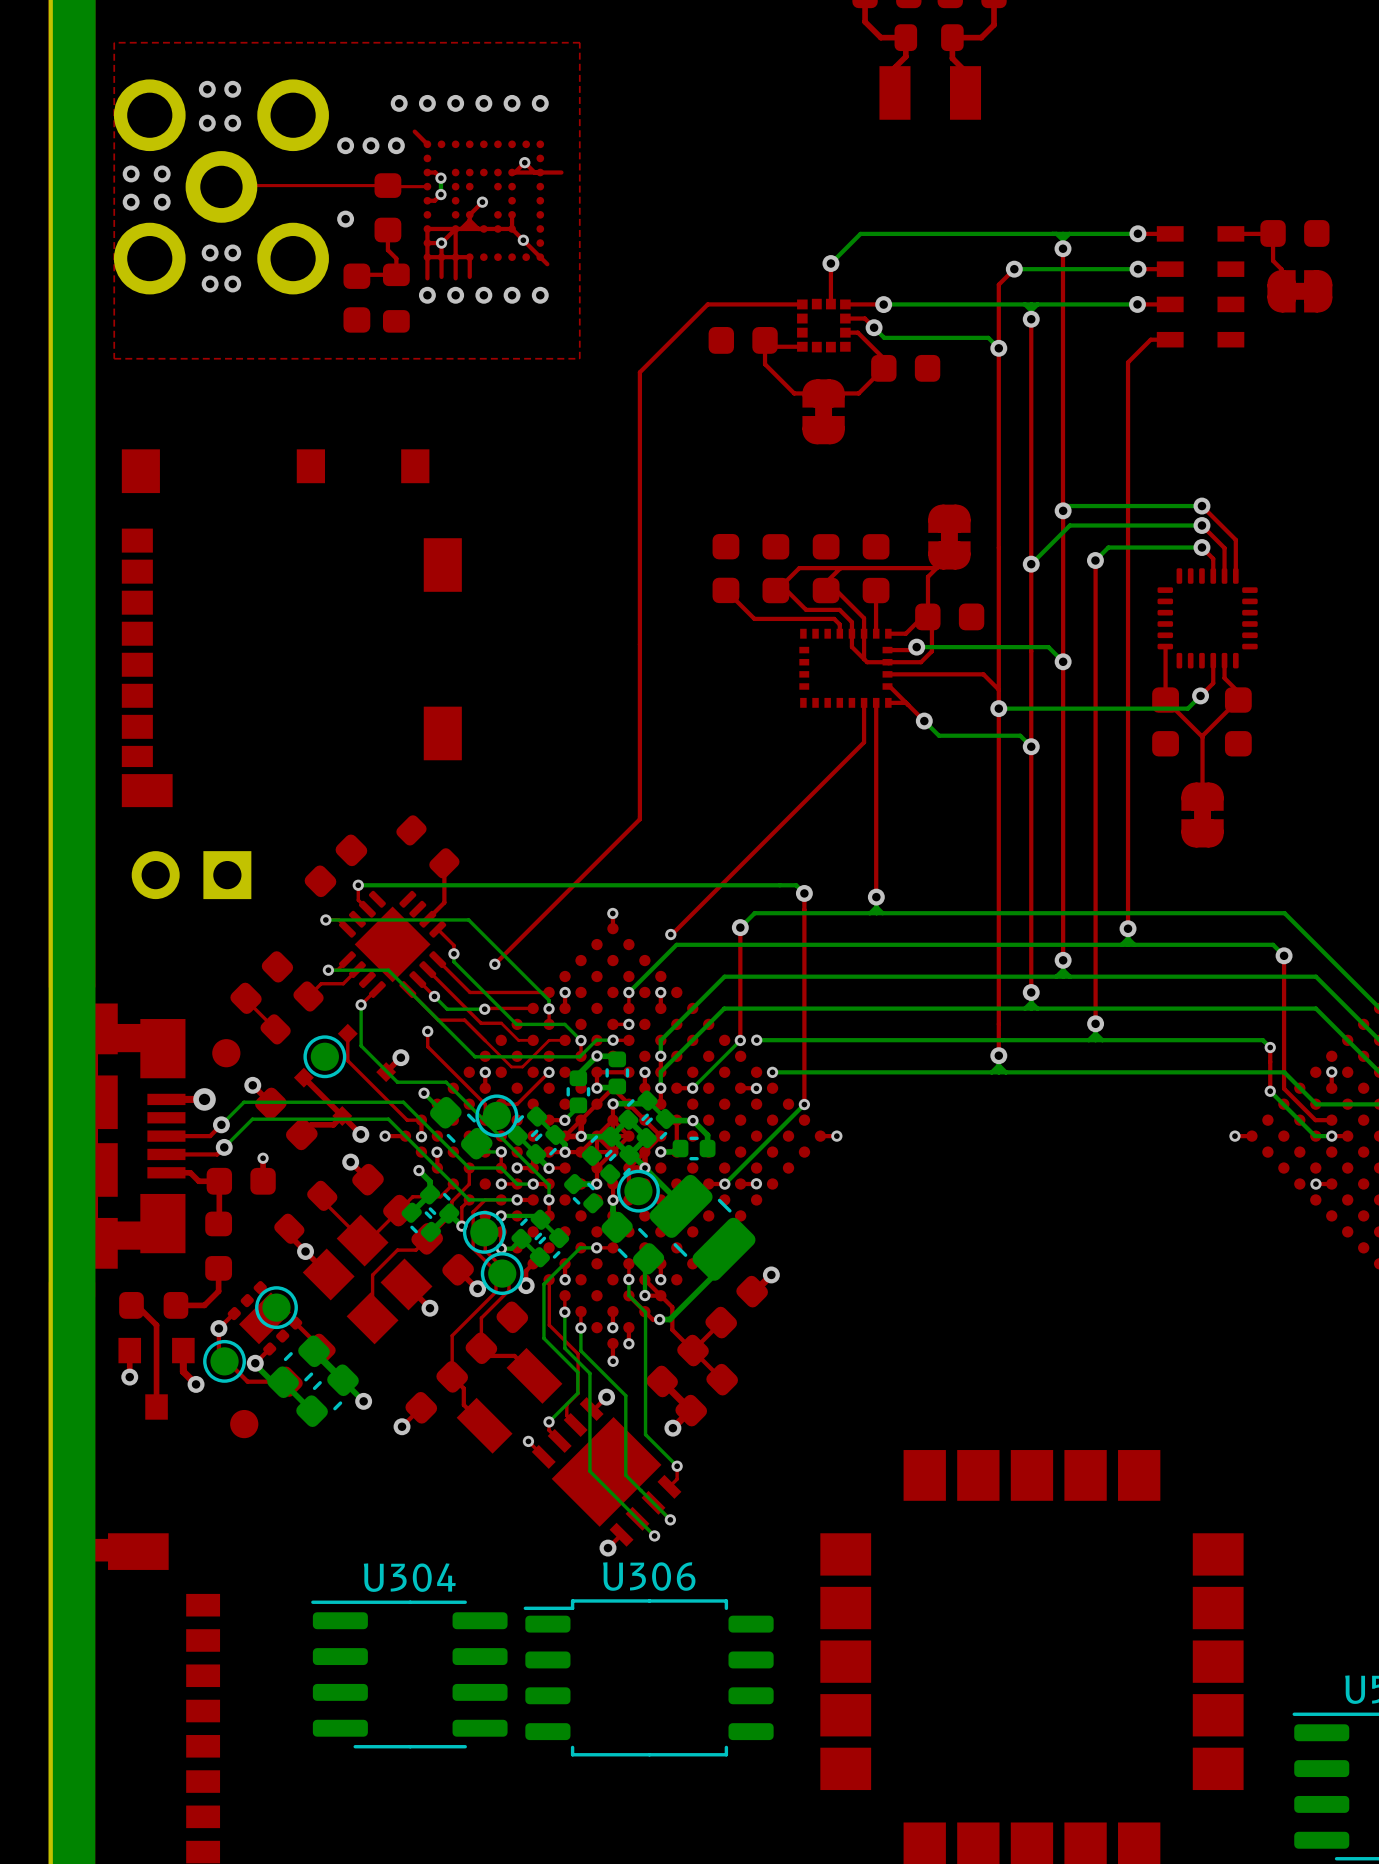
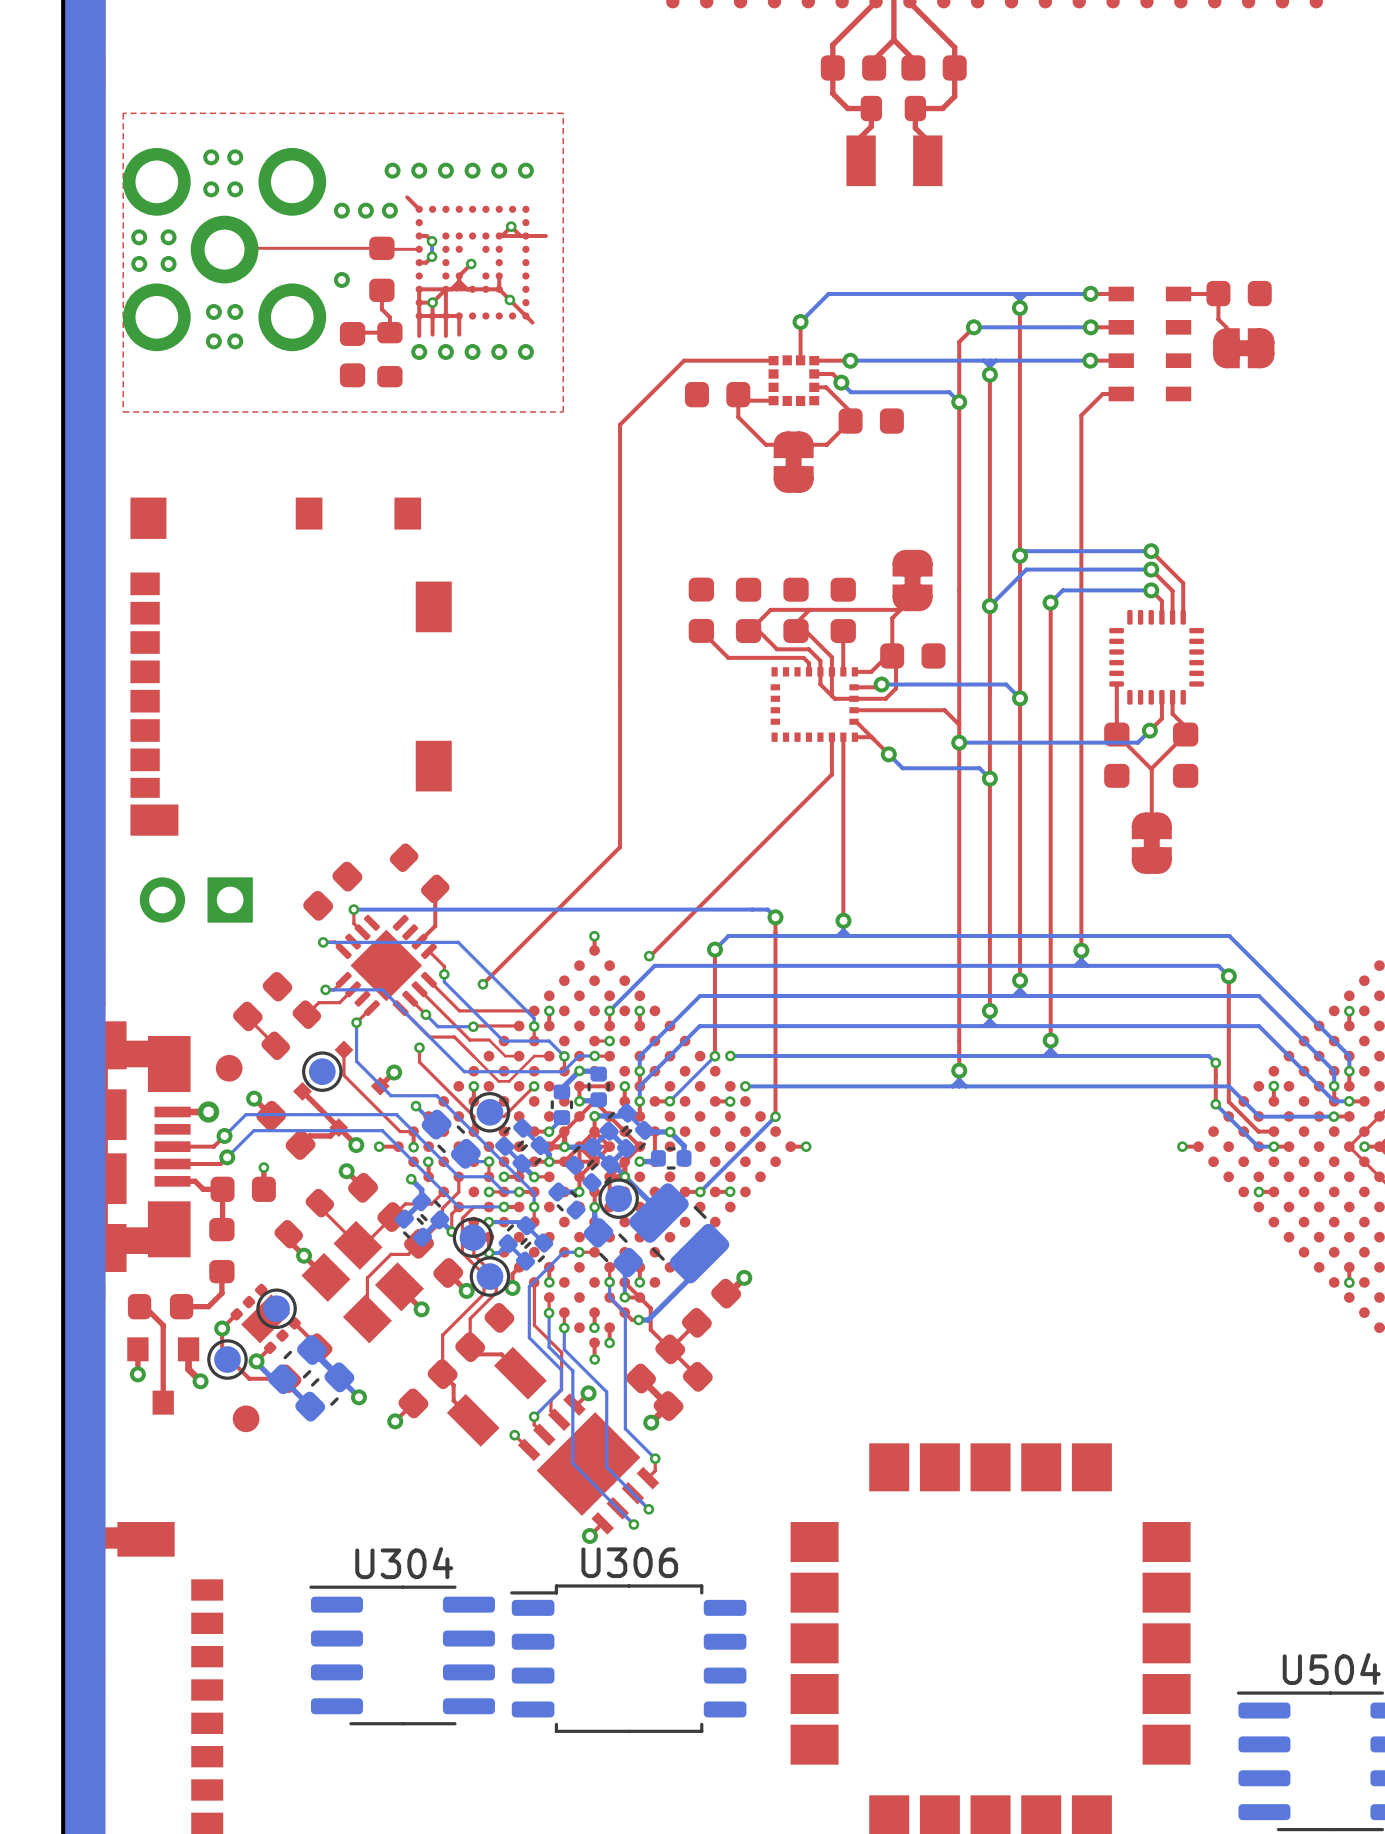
part position: (496, 1115) -> (489, 1112)

